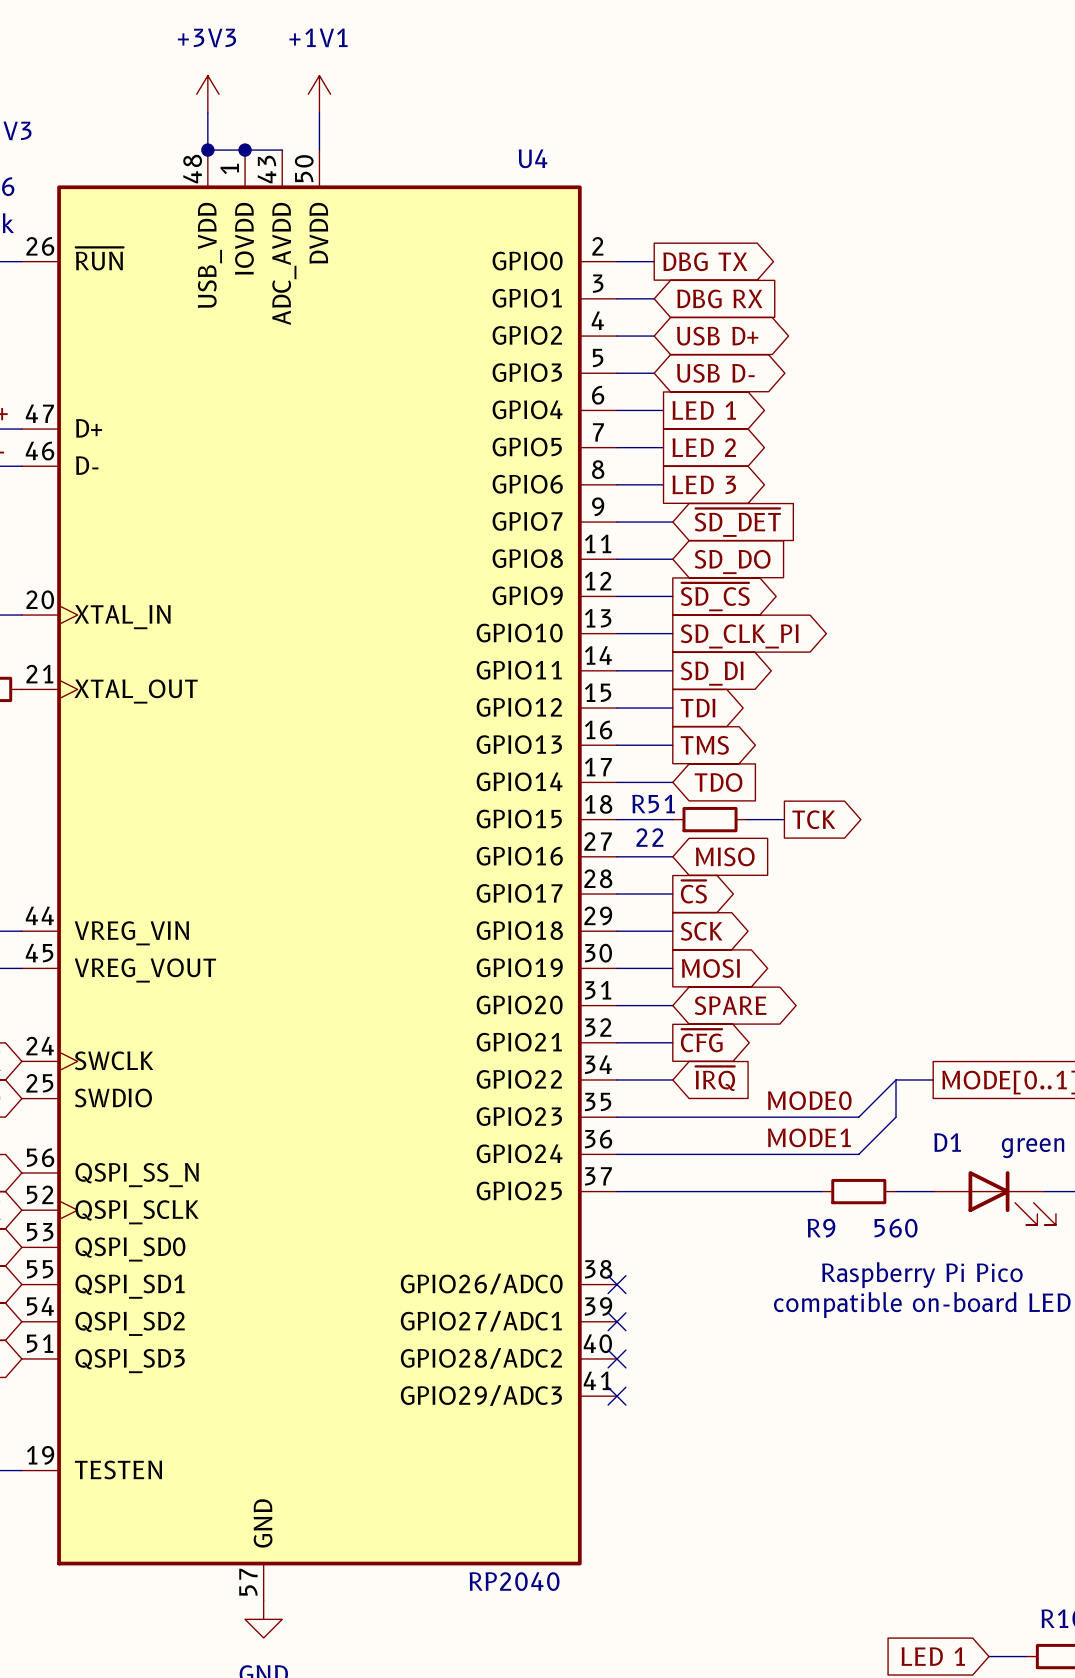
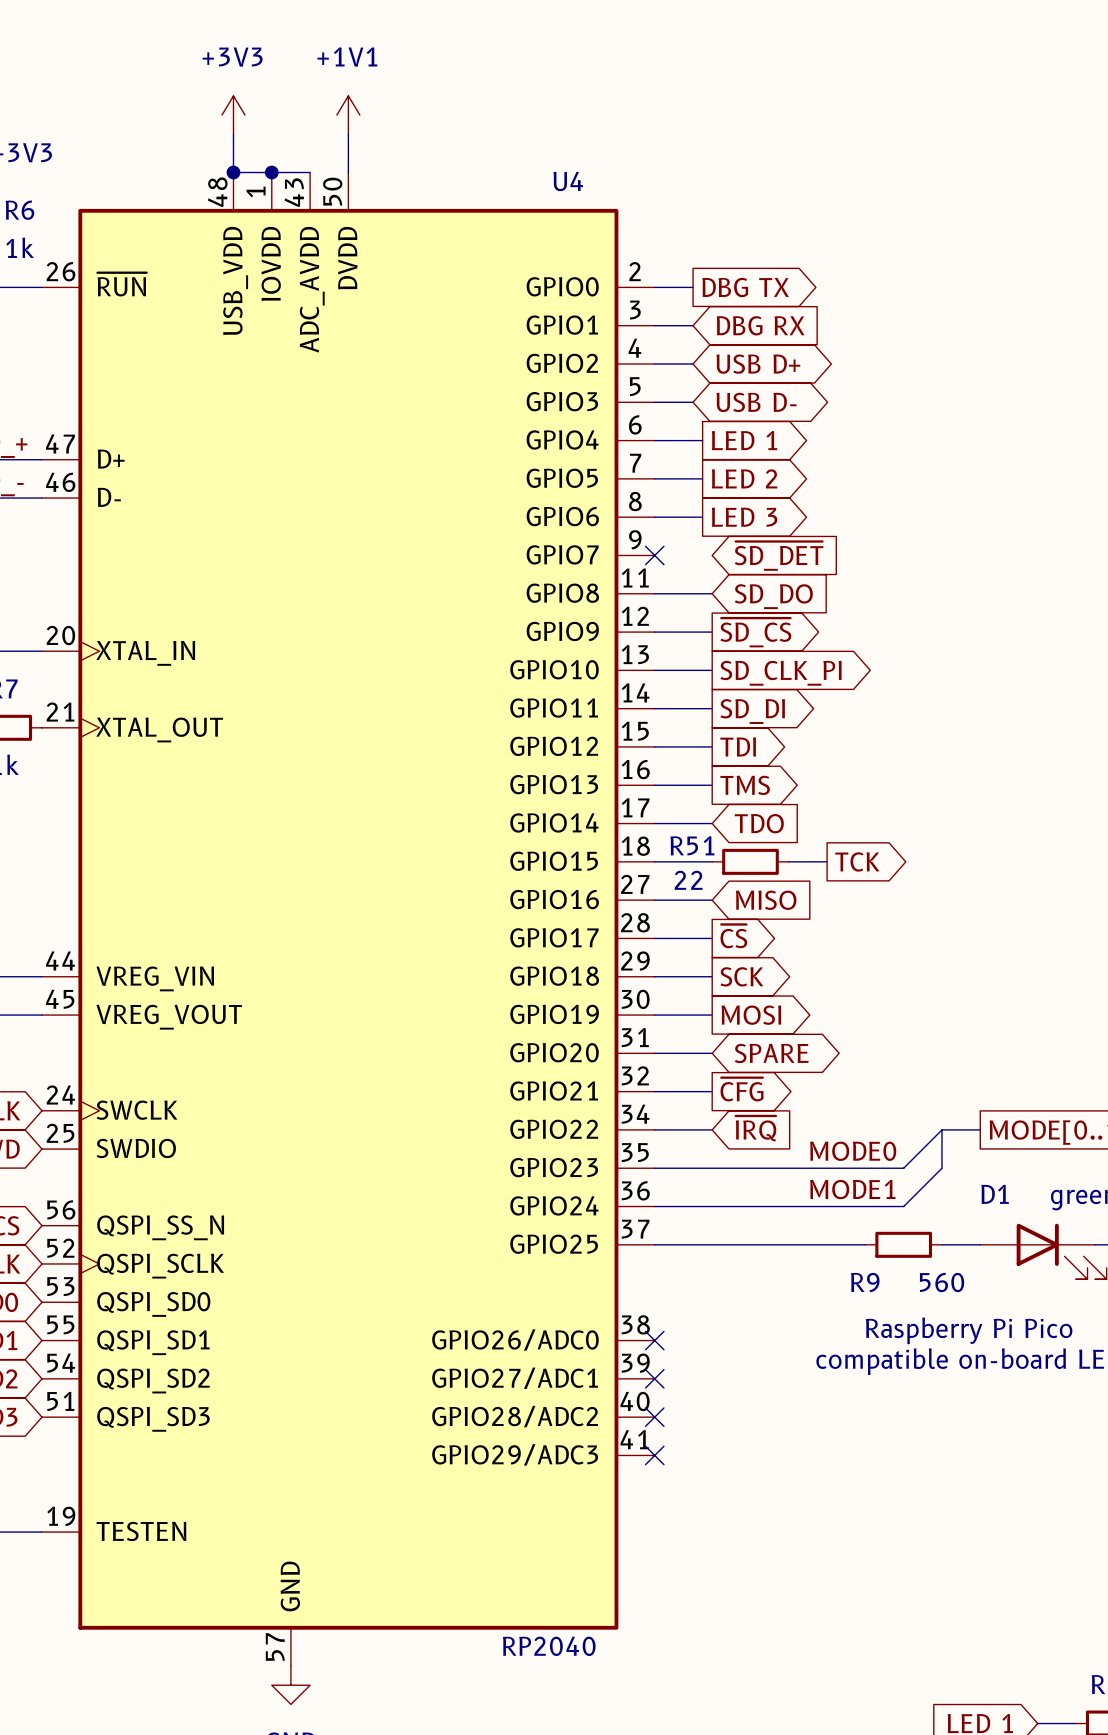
wire: (617, 522) (672, 522) -> none
no-connect mark: none -> (654, 555)

